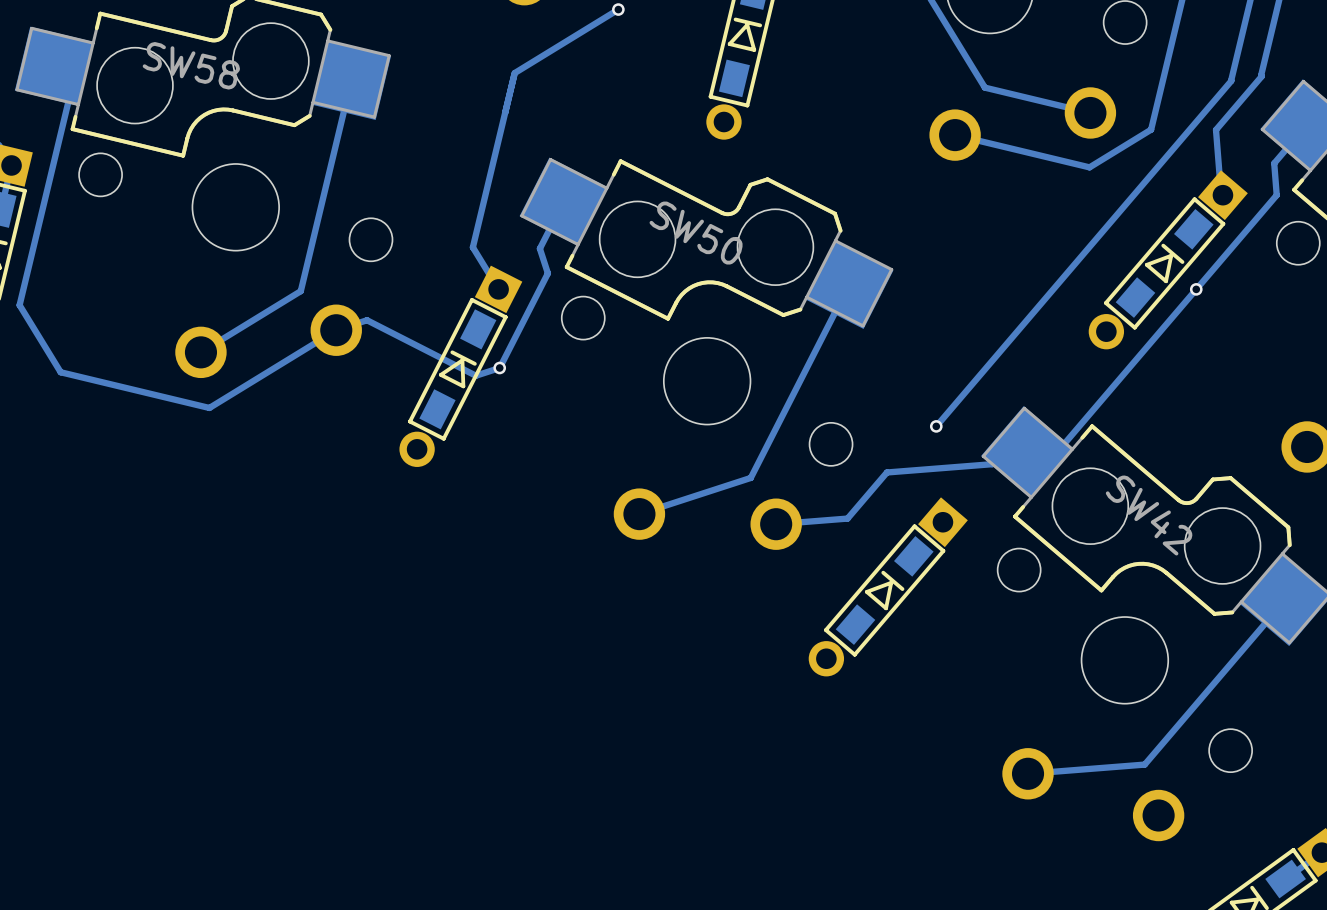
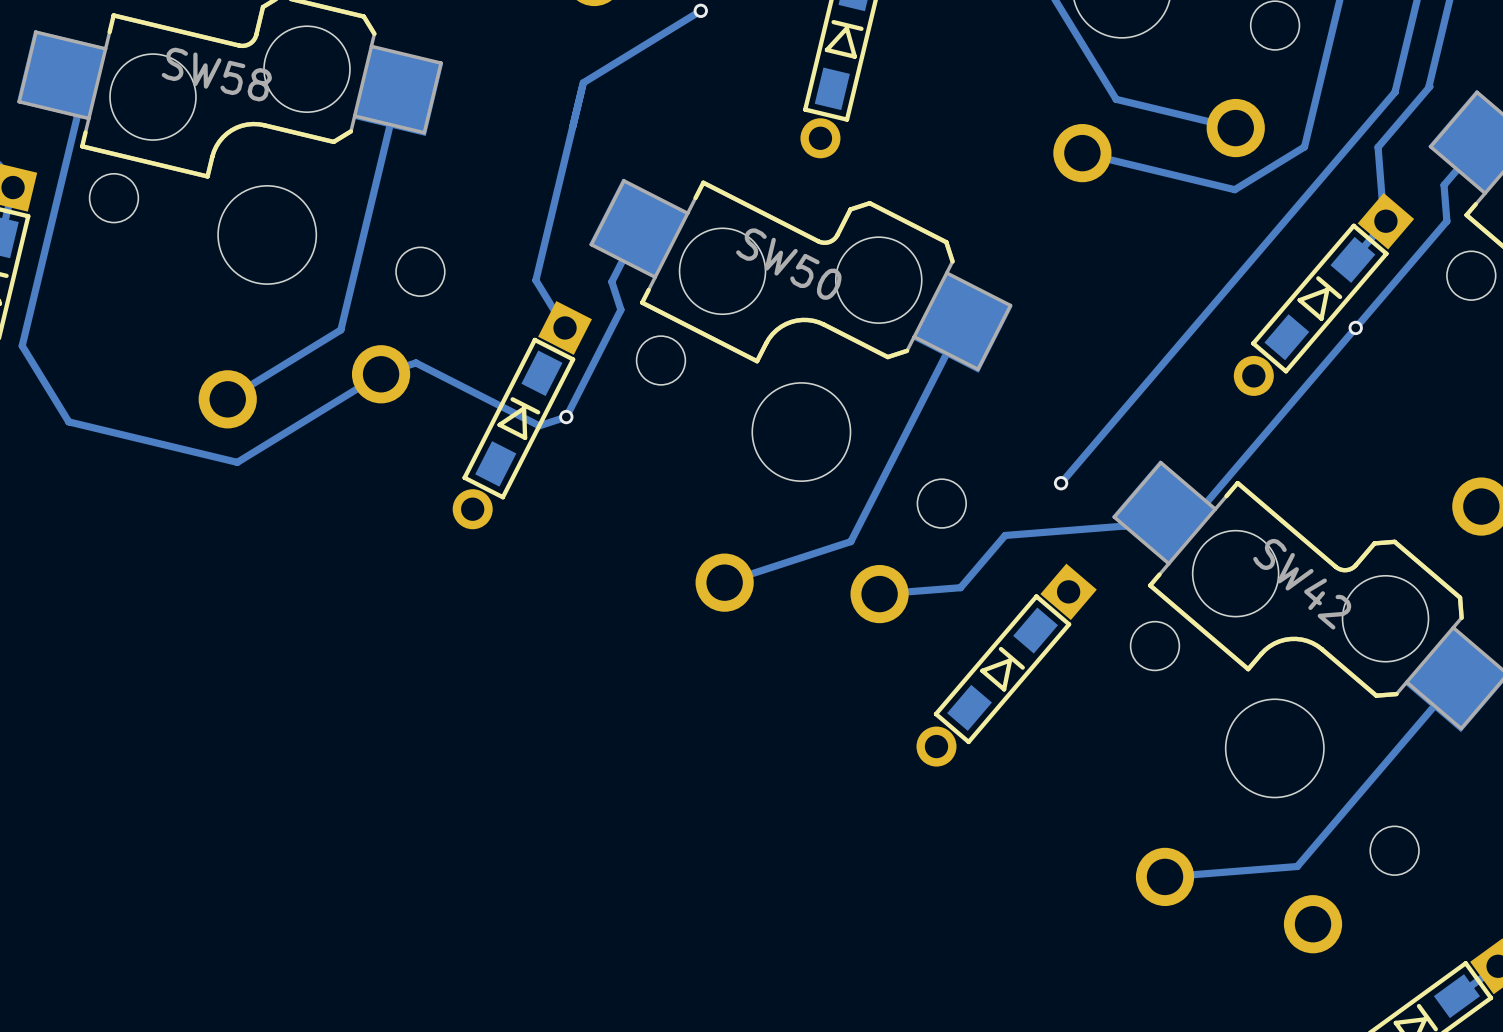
track: (1216, 129) (1221, 193) (1222, 195) -> (1378, 147) (1383, 219) (1385, 221) (1352, 259)

